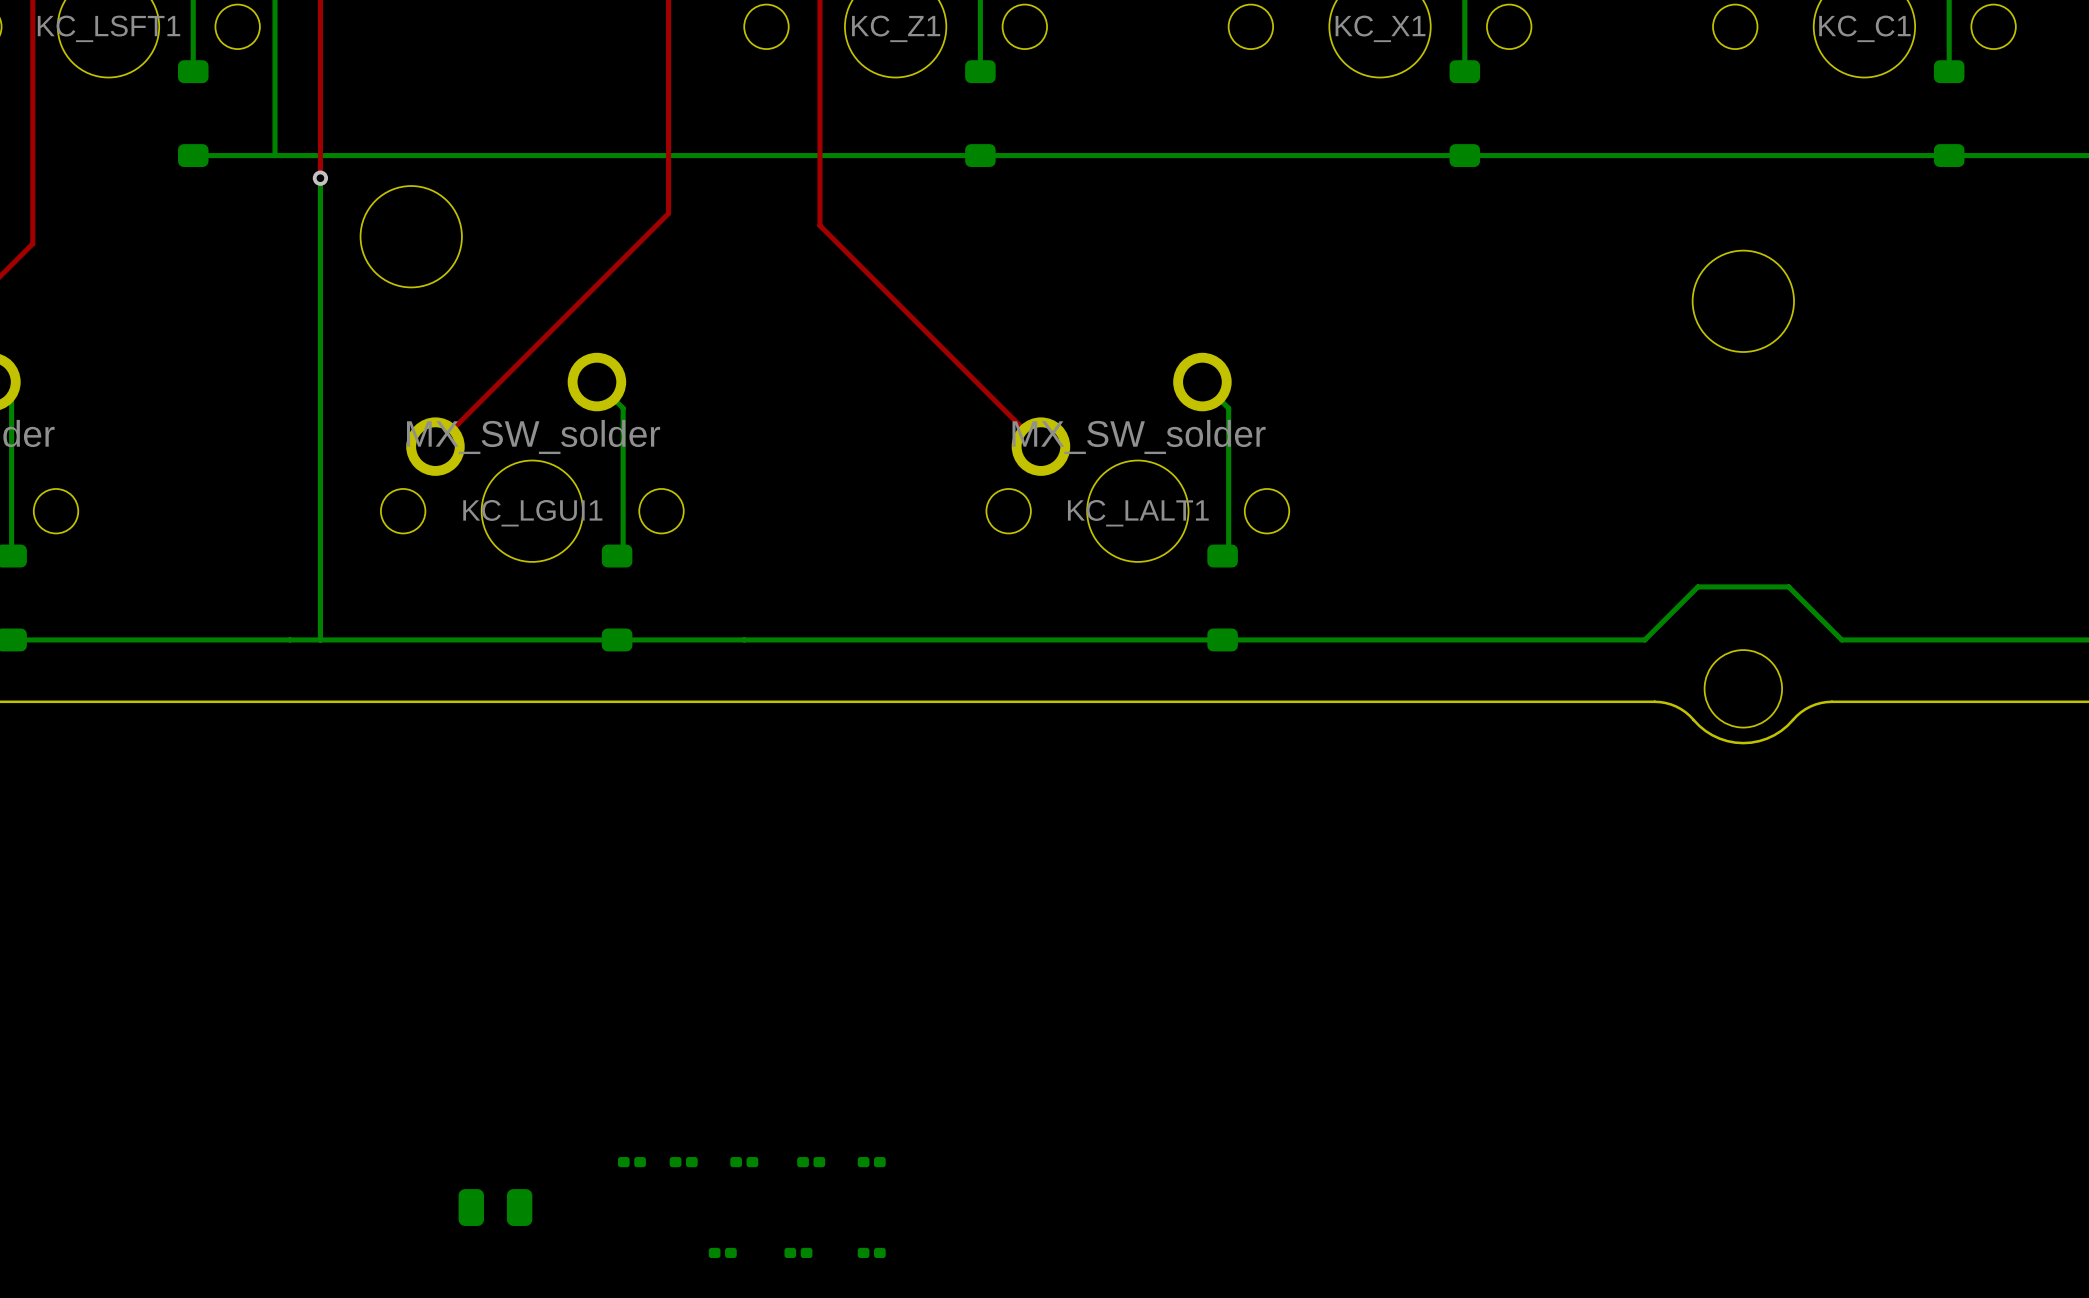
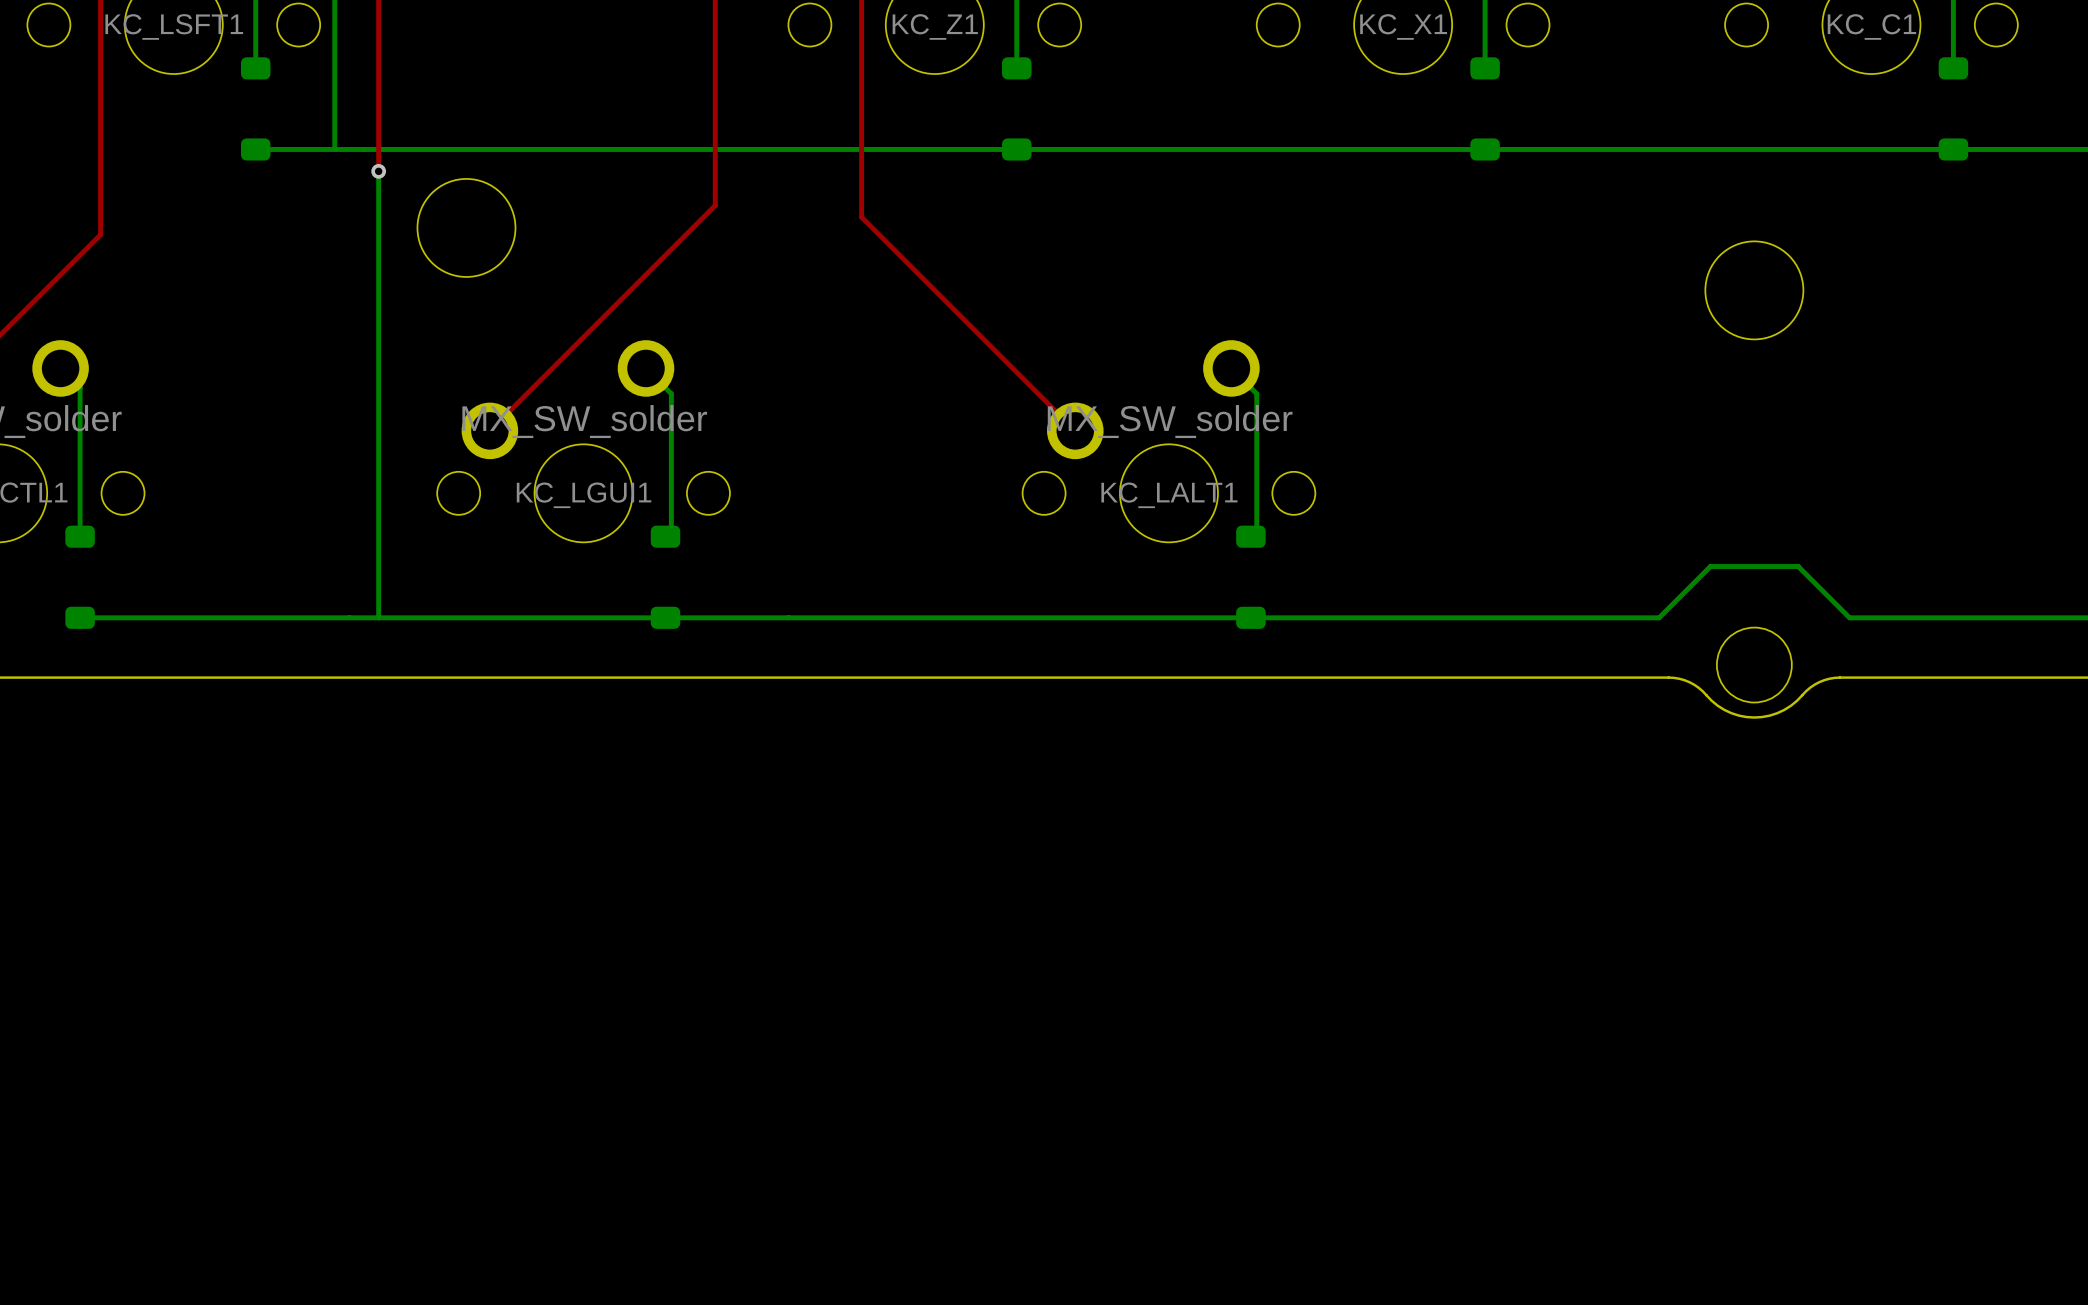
part: (631, 1162) -> none
part: (683, 1162) -> none
part: (744, 1162) -> none
part: (811, 1162) -> none
part: (871, 1162) -> none
part: (495, 1207) -> none
part: (722, 1252) -> none
part: (798, 1252) -> none
part: (871, 1252) -> none

